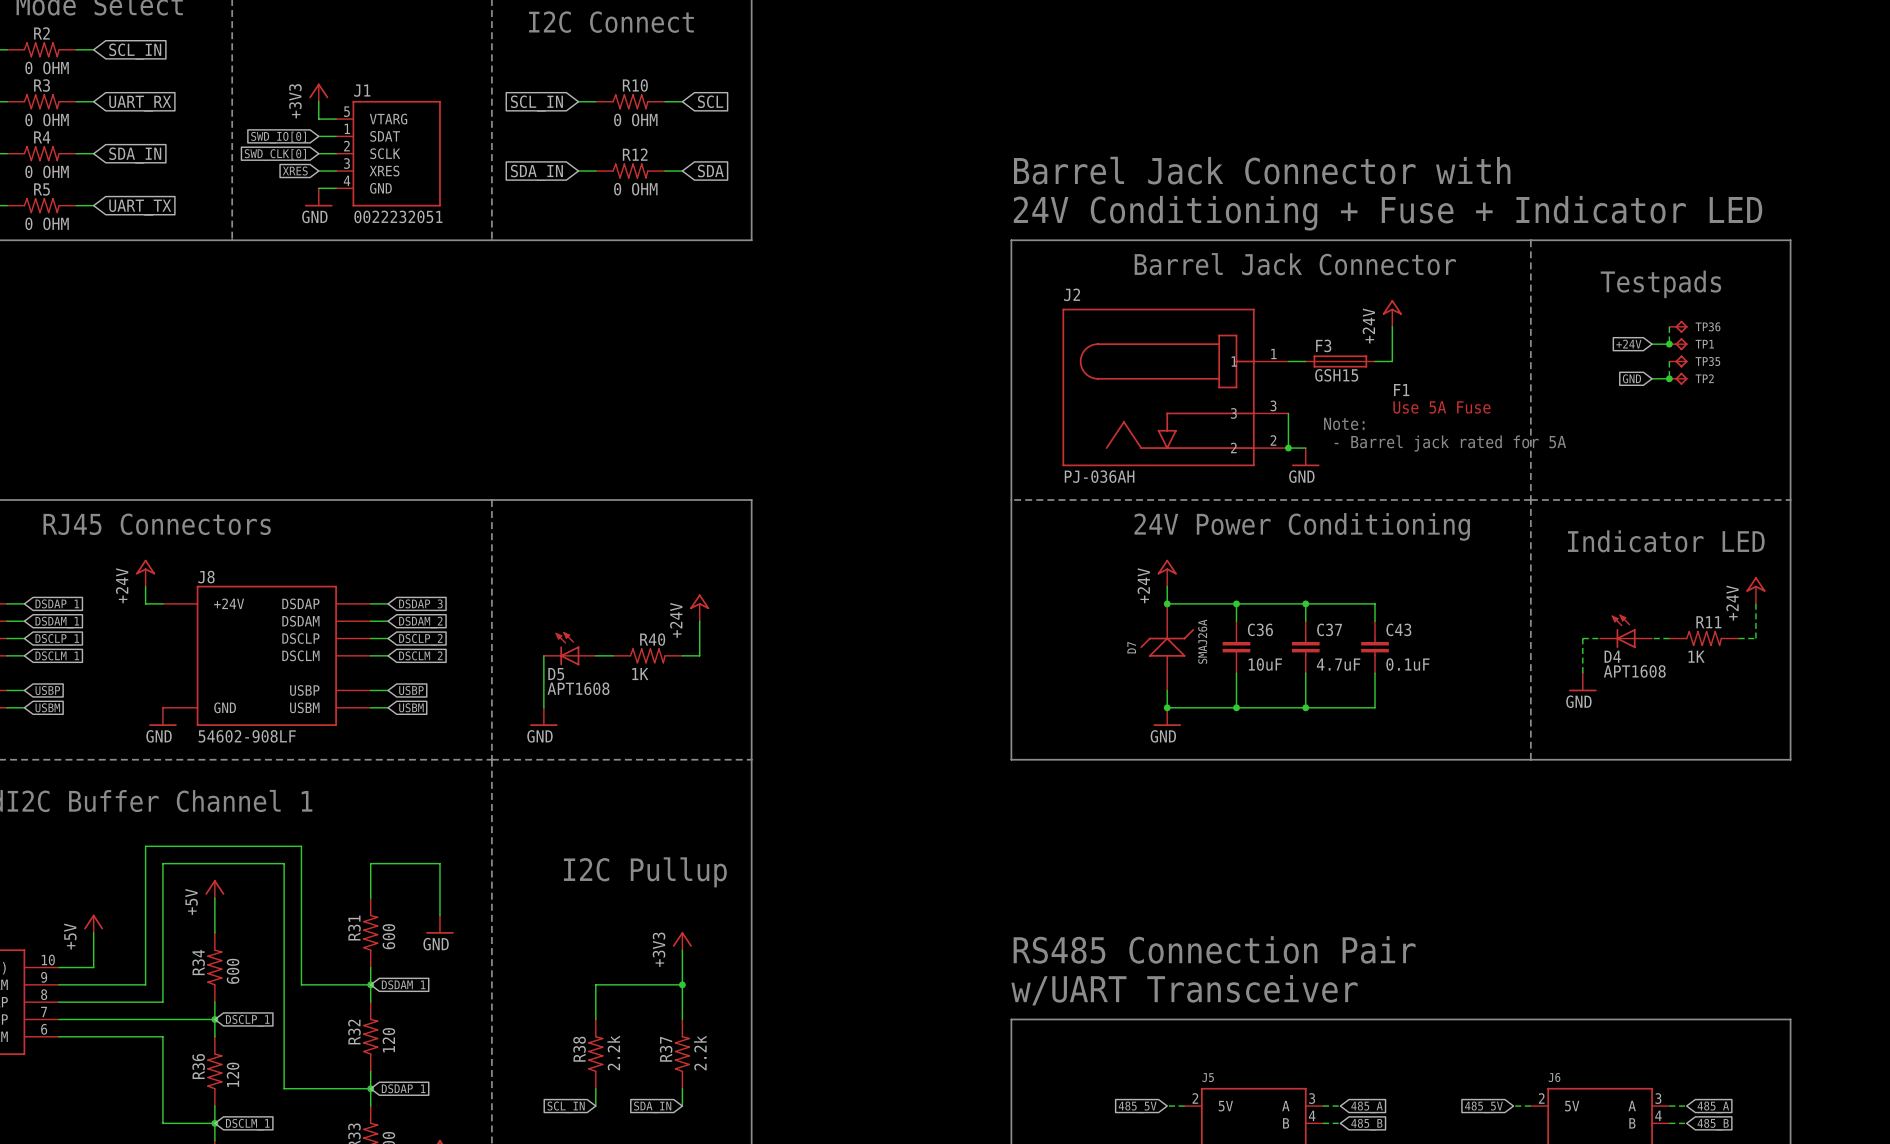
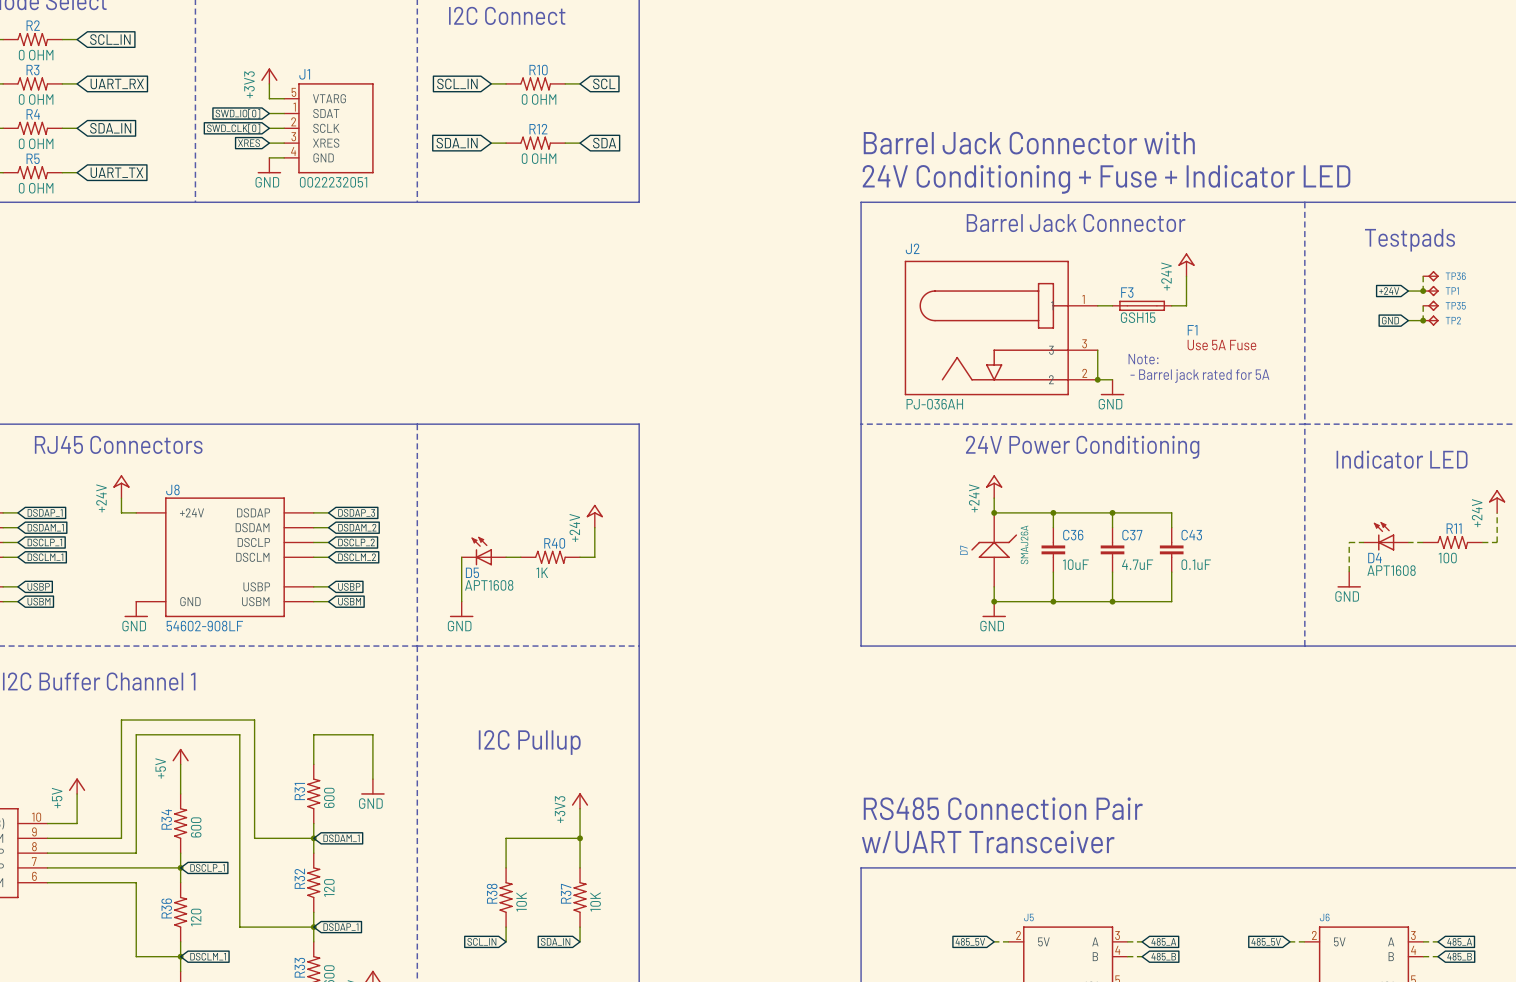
R11 value: 1K (1696, 656) -> 100 (1447, 558)
R38 value: 2.2k (613, 1052) -> 10K (521, 901)
R37 value: 2.2k (700, 1052) -> 10K (595, 901)

